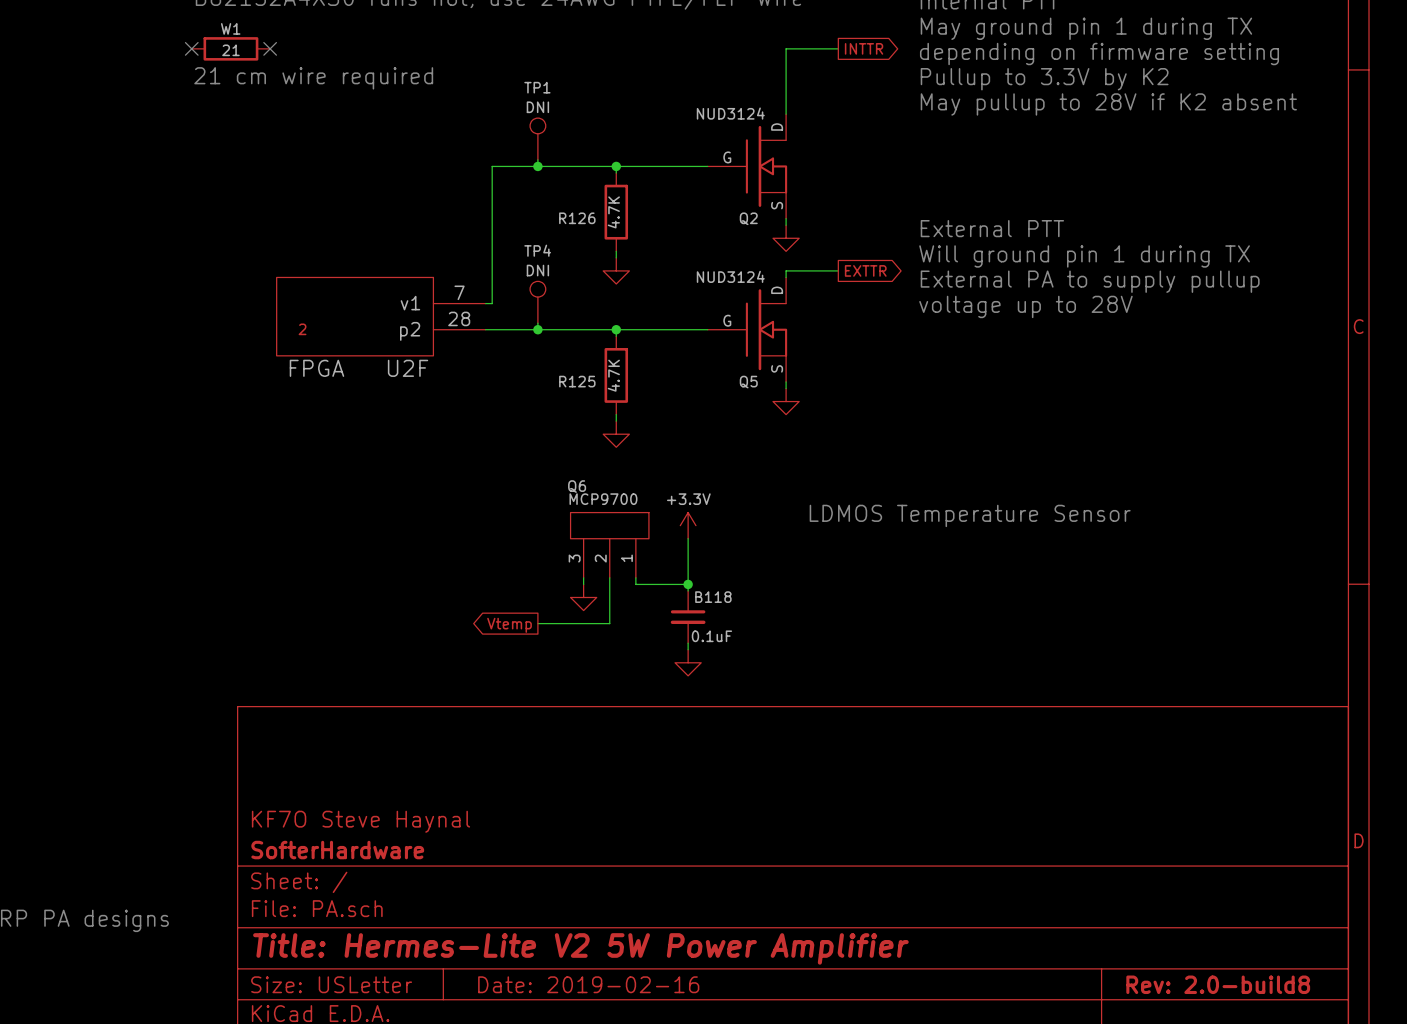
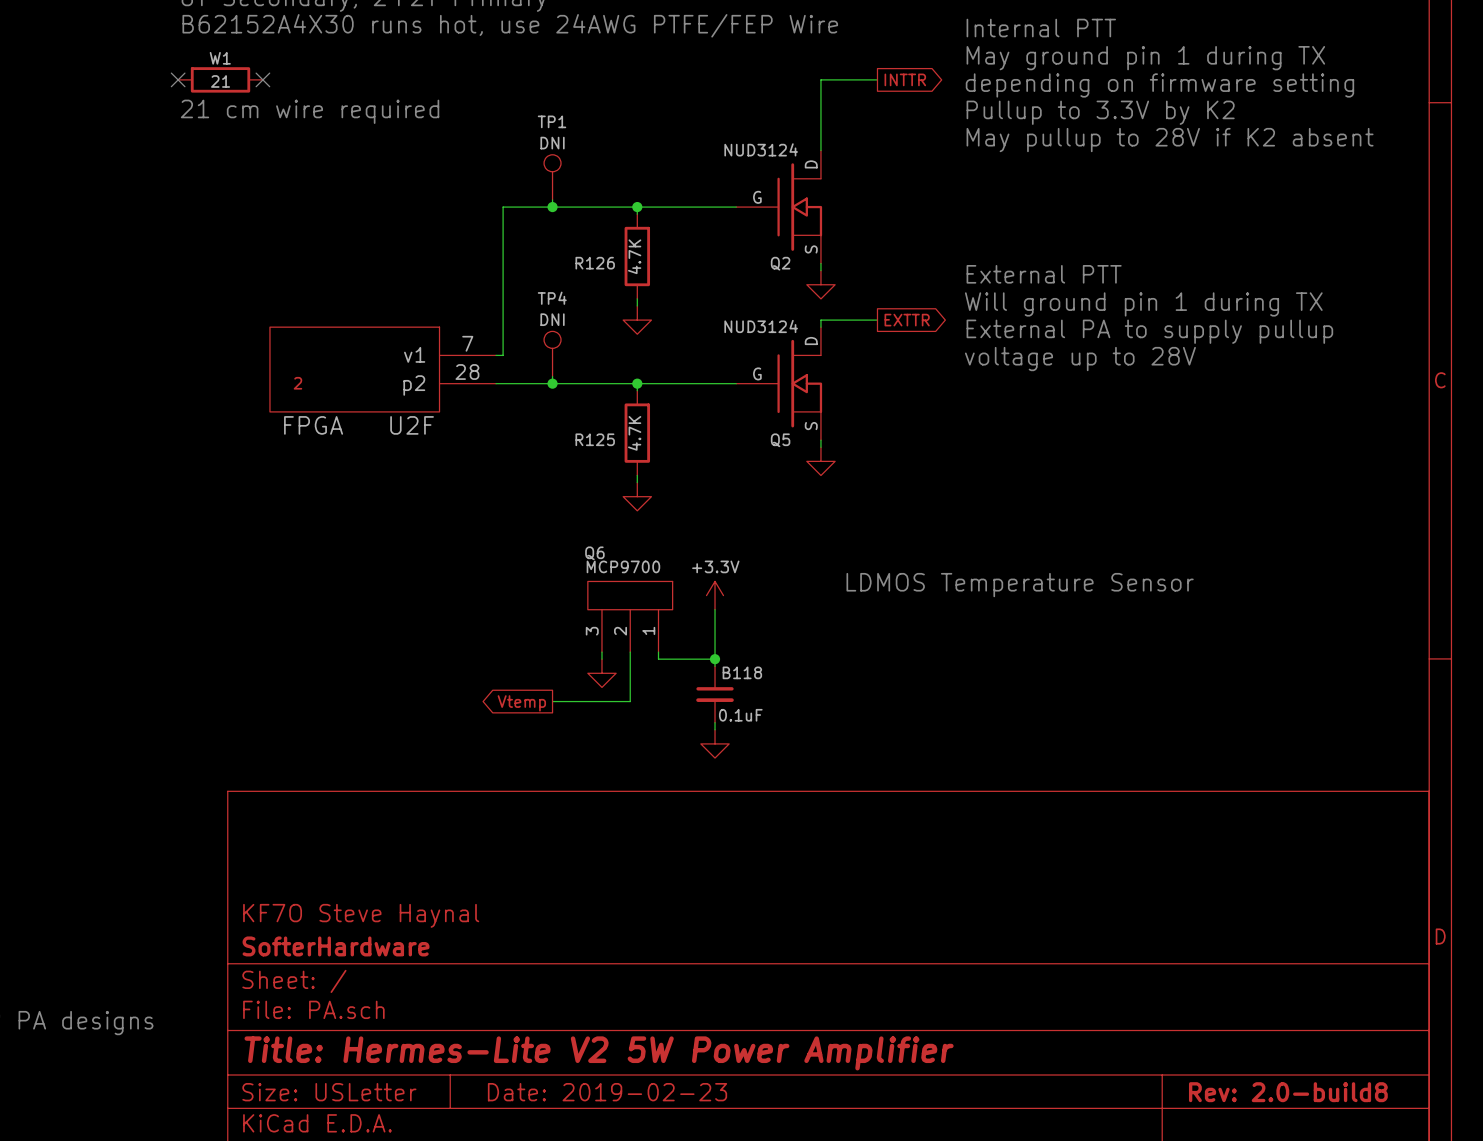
title block: Date: 2019-02-16 (588, 984) -> Date: 2019-02-23 (607, 1092)

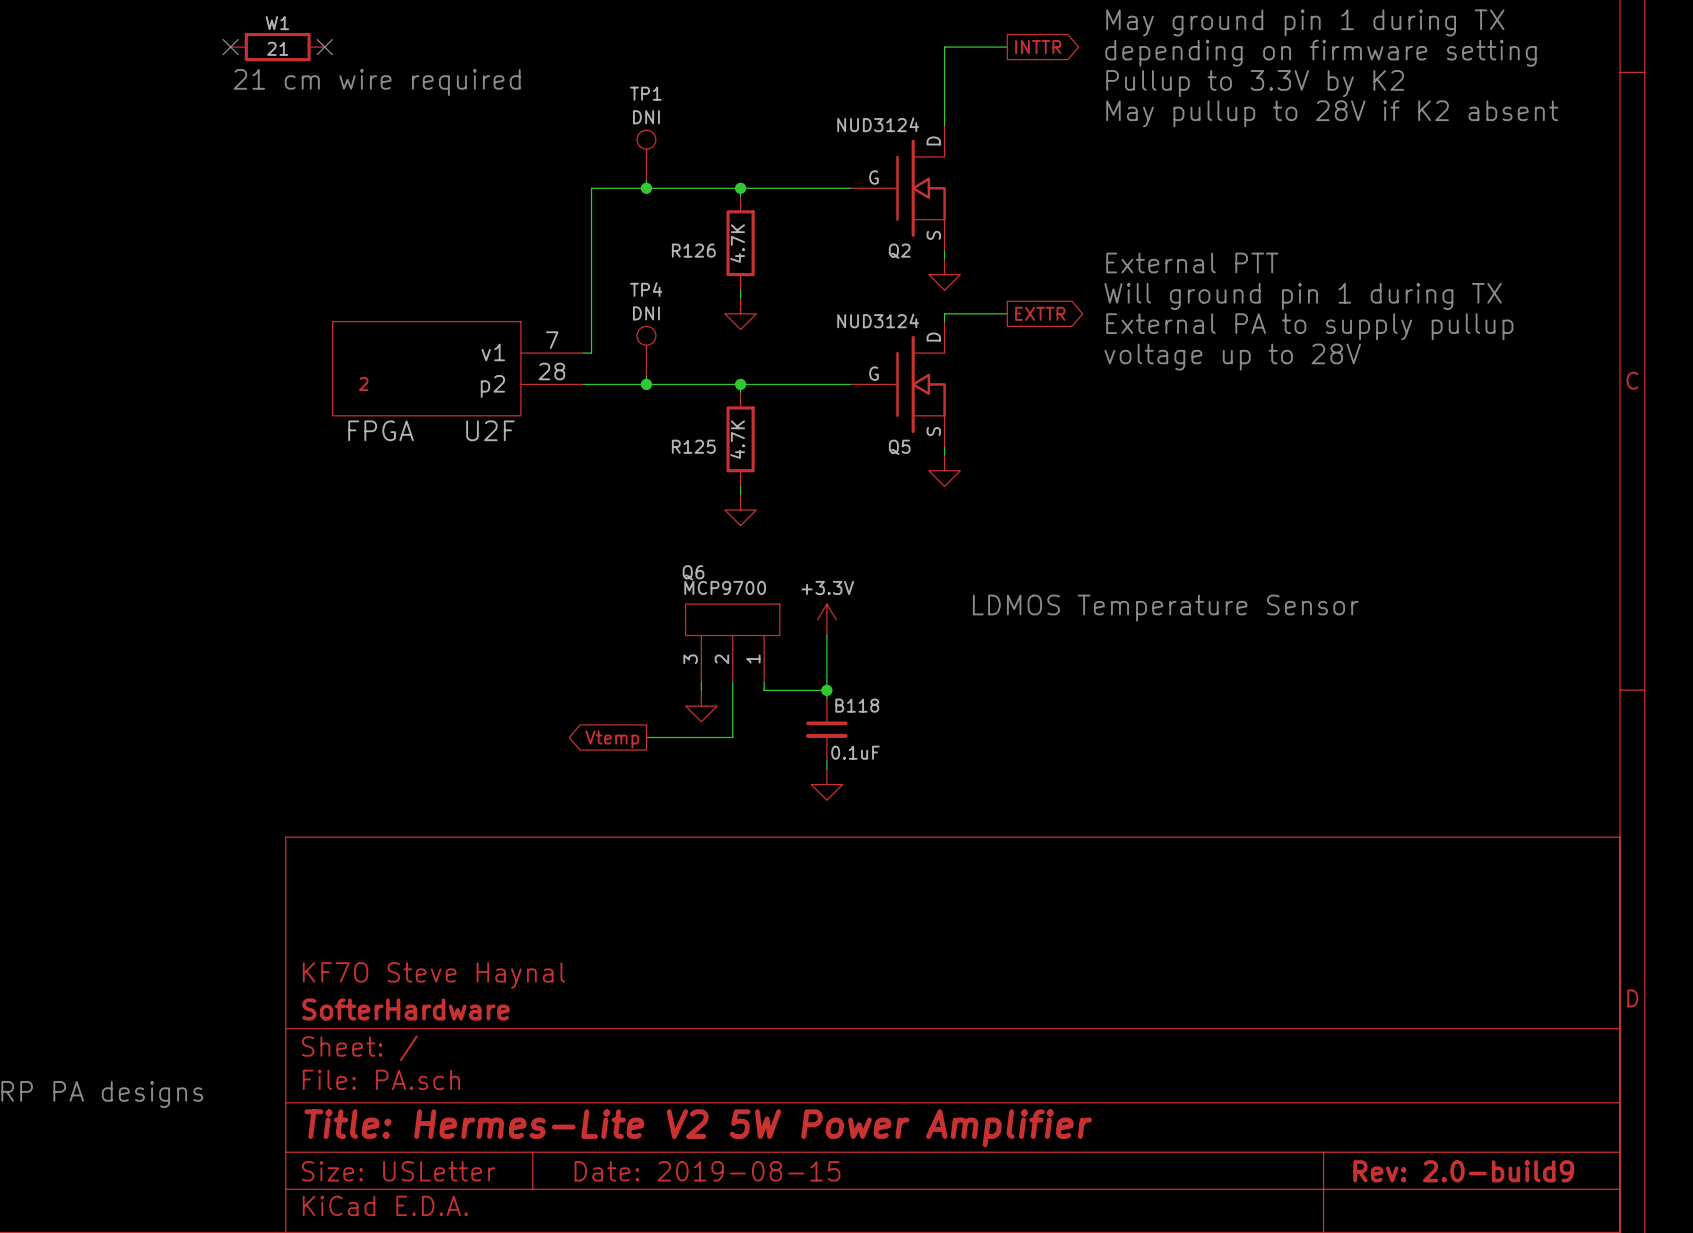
title block: Date: 2019-02-23 (607, 1092) -> Date: 2019-08-15 (707, 1171)
title block: Rev: 2.0-build8 (1288, 1092) -> Rev: 2.0-build9 (1463, 1171)

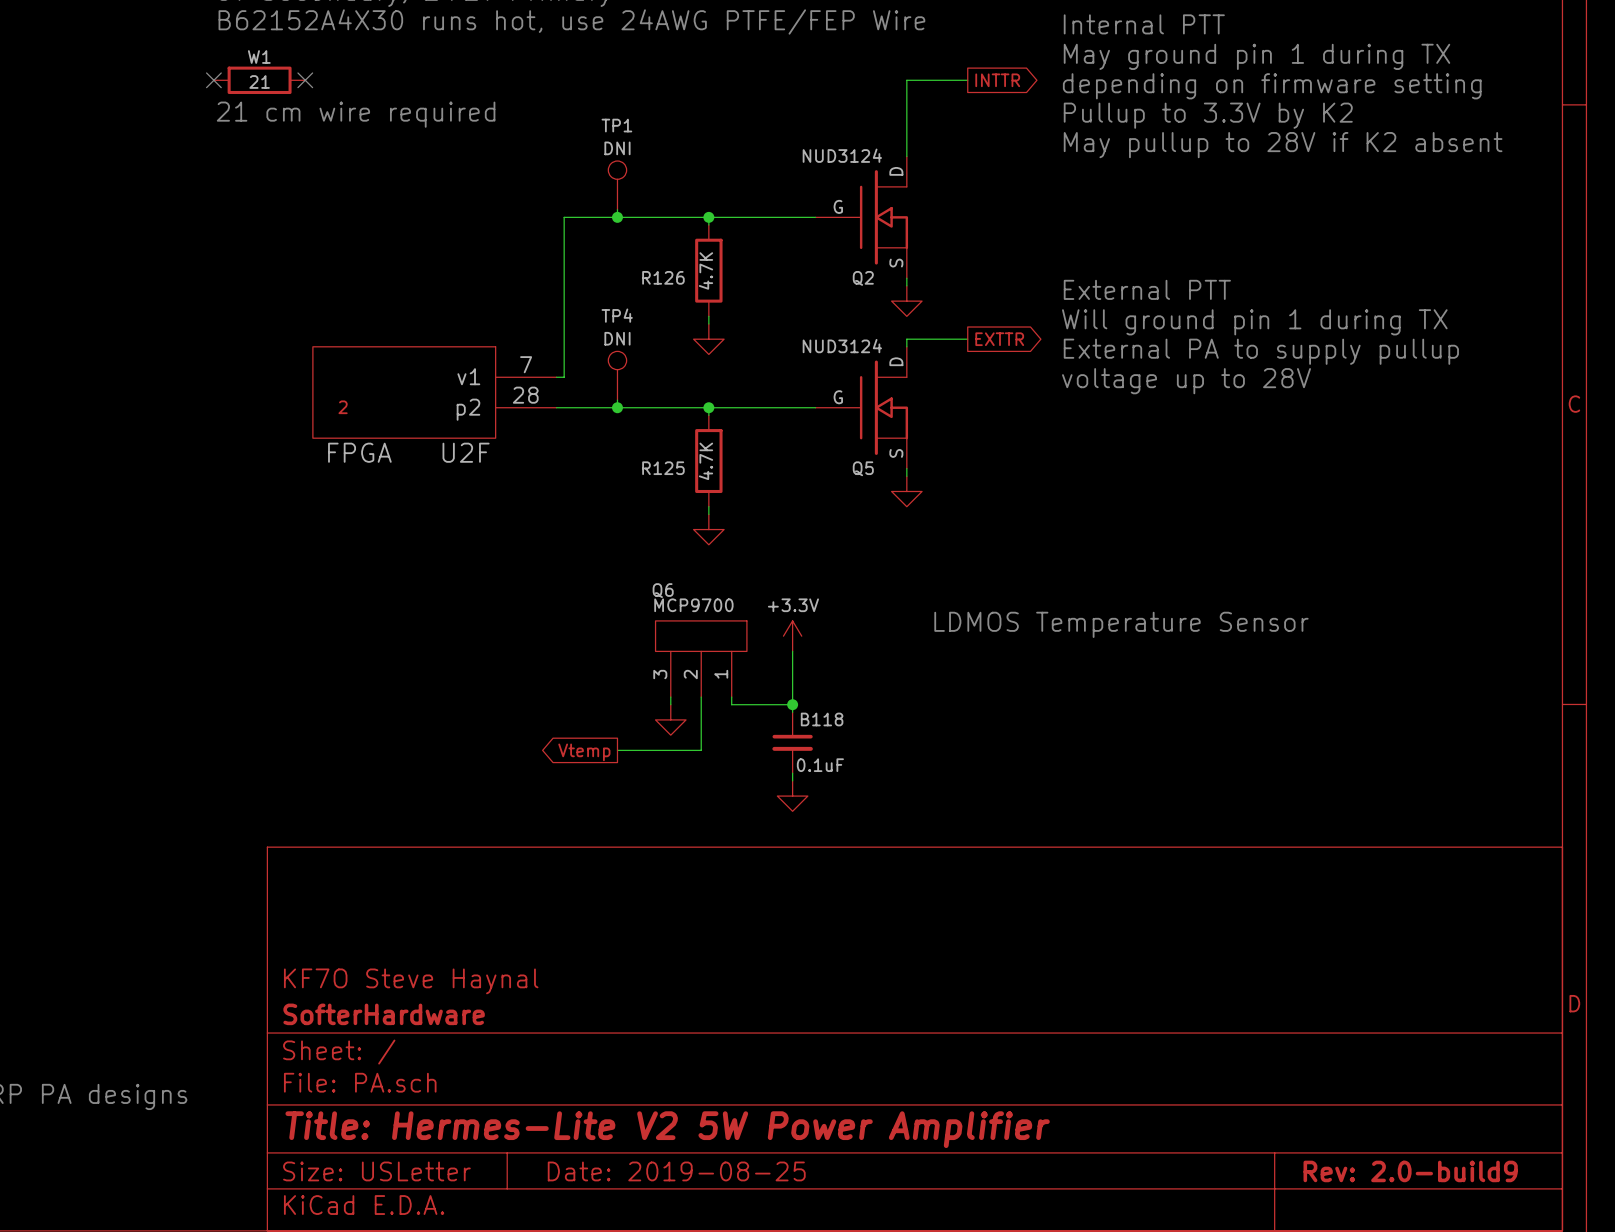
title block: Date: 2019-08-15 (707, 1171) -> Date: 2019-08-25 (676, 1171)

